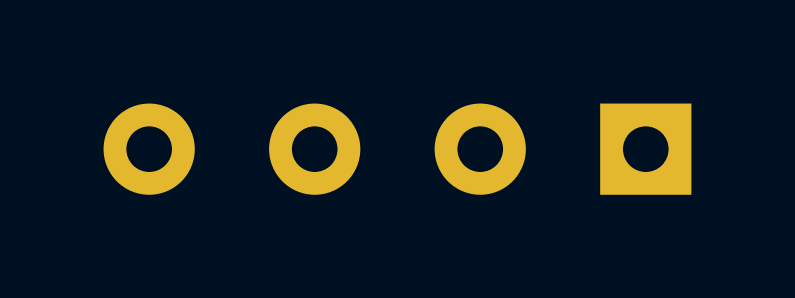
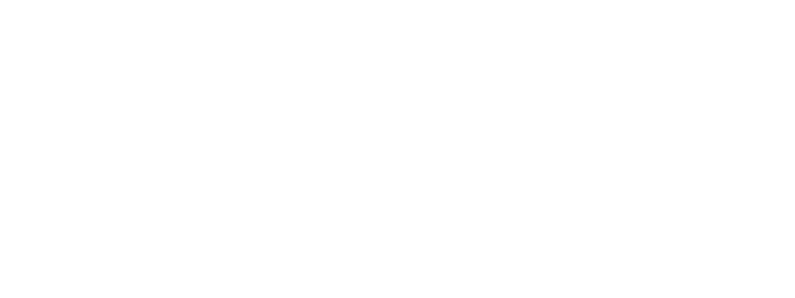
part: (397, 149) -> none

